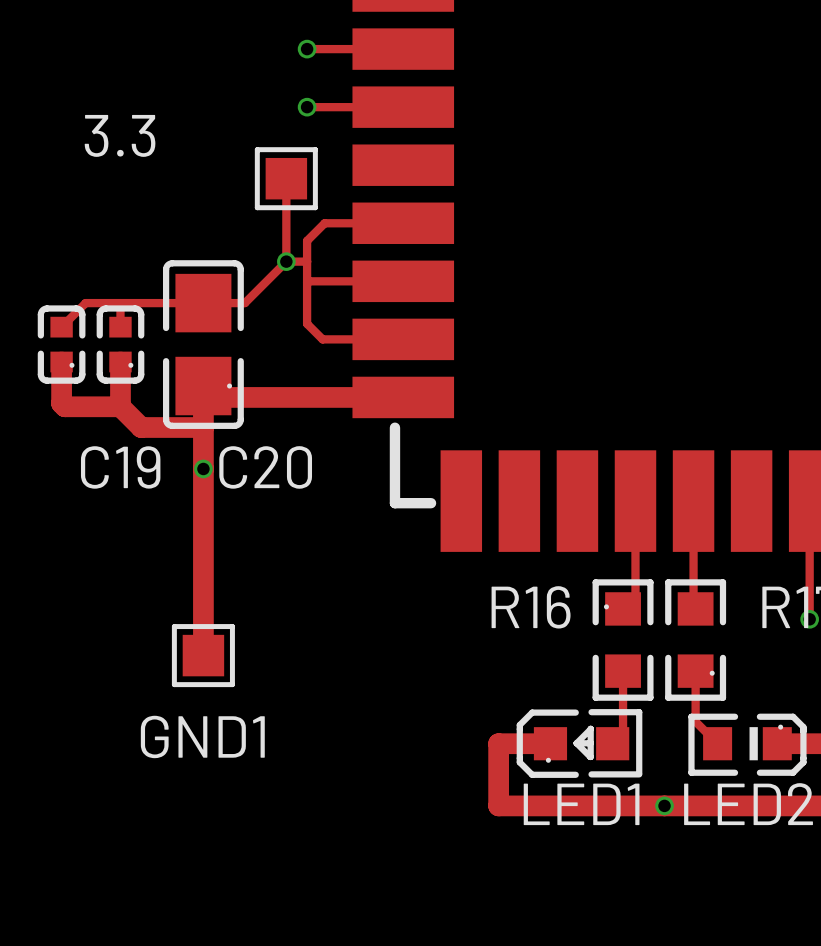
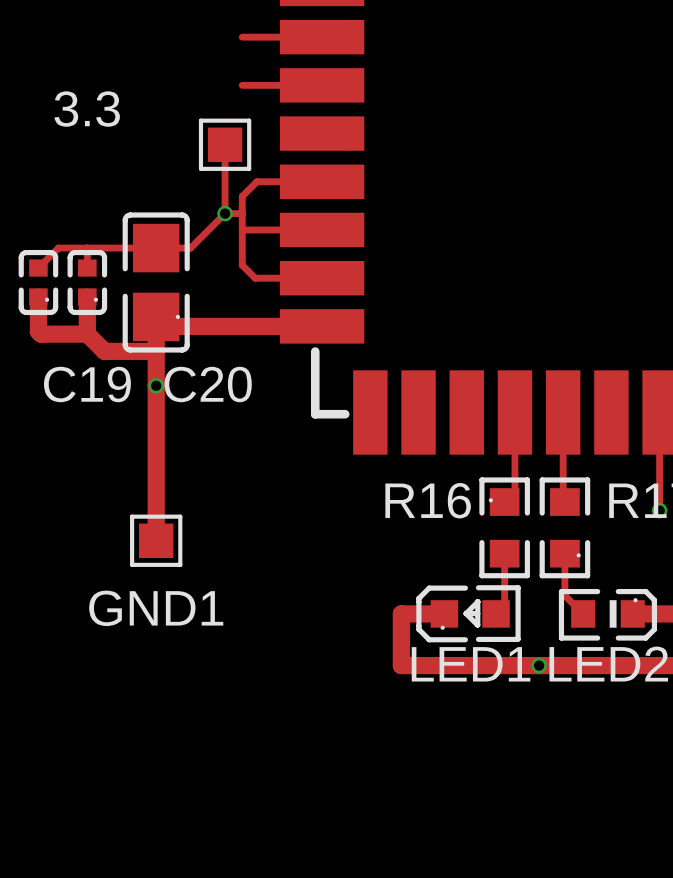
via: (307, 49) -> none
via: (307, 107) -> none

